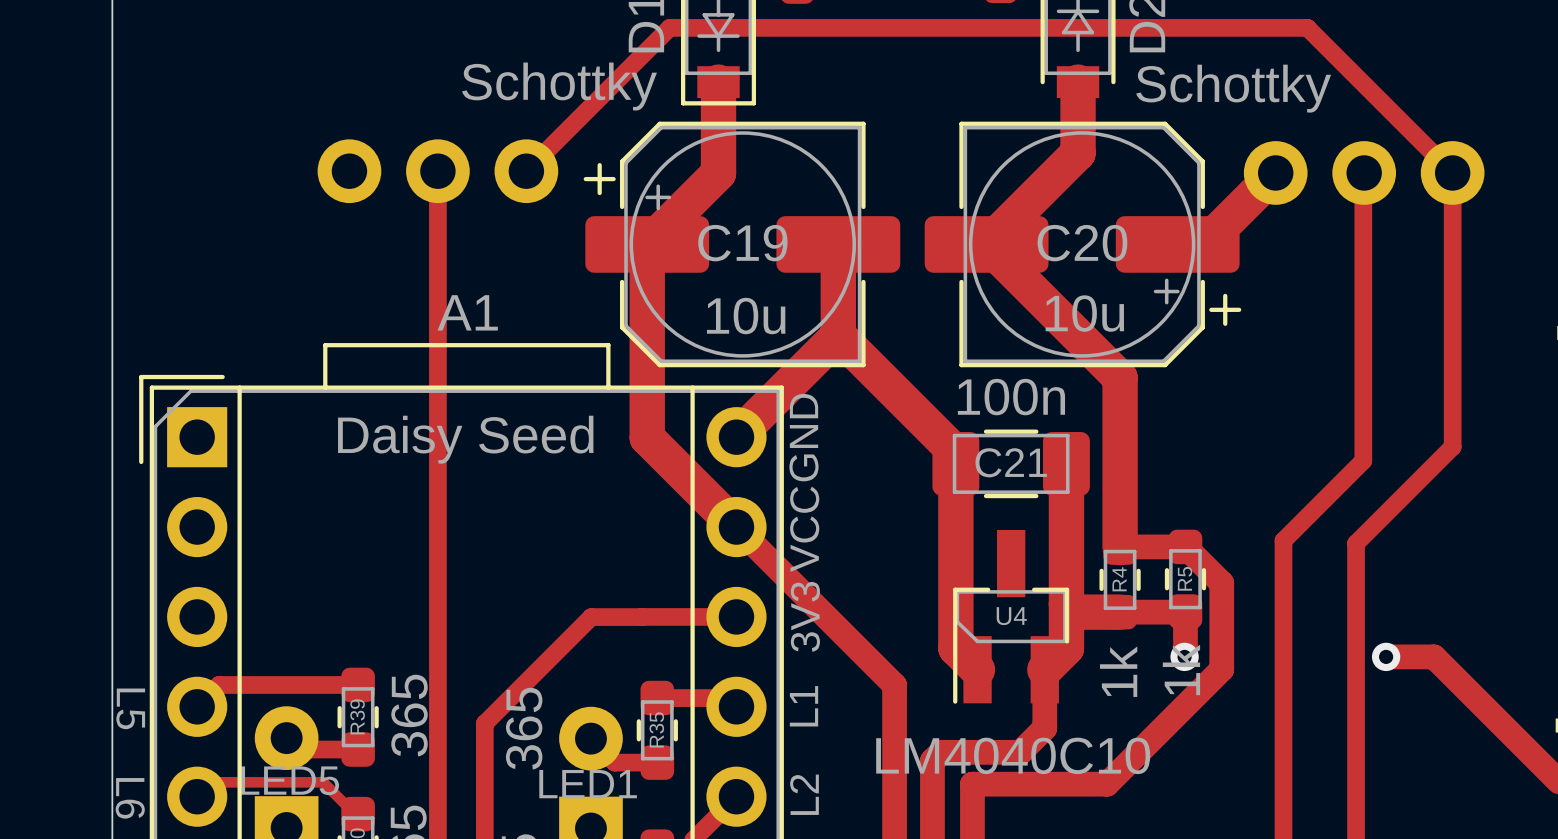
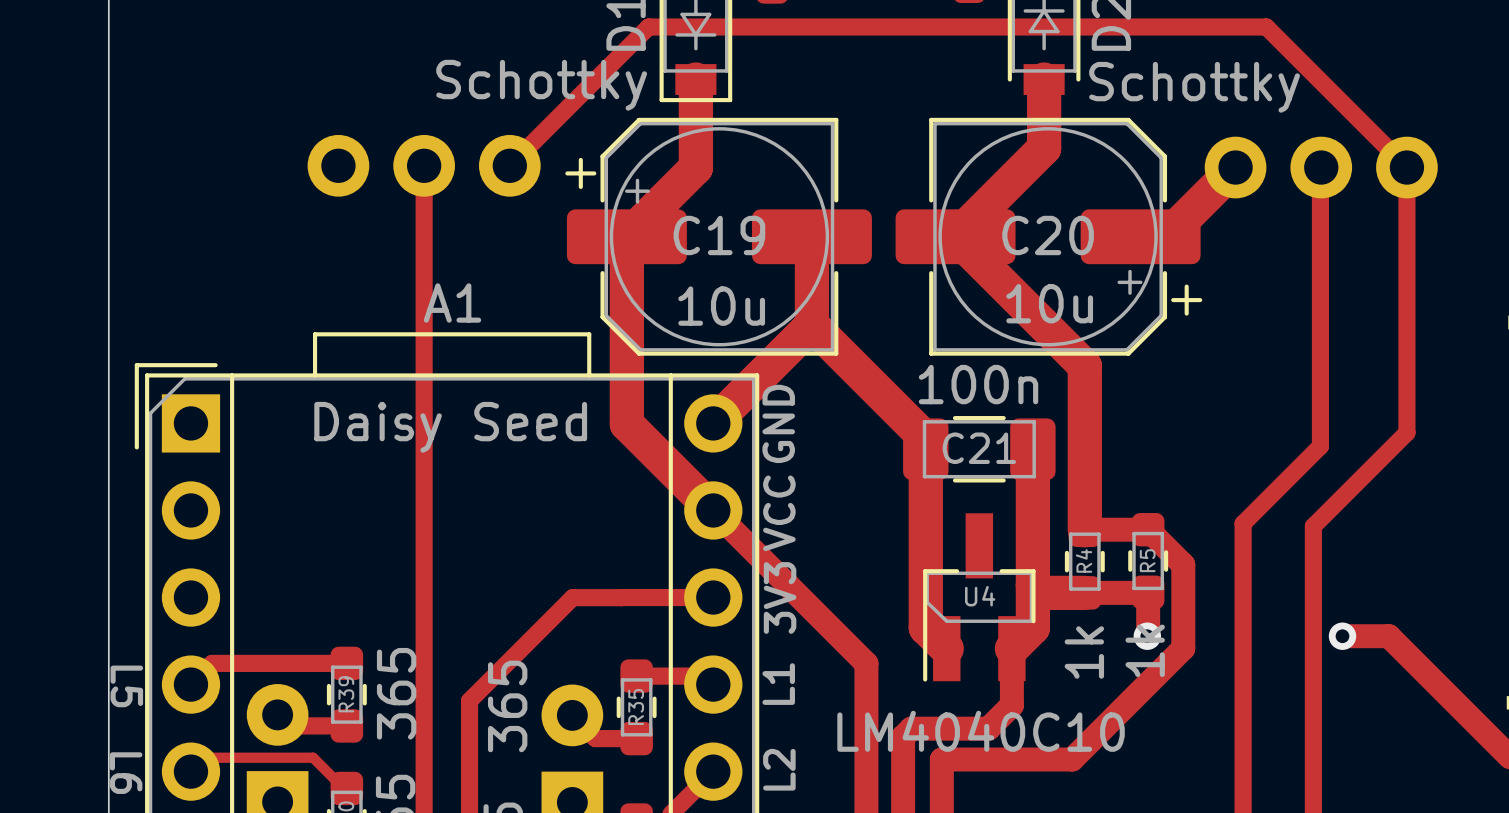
text: LED5 (290, 780) -> none
text: LED1 (588, 784) -> none

